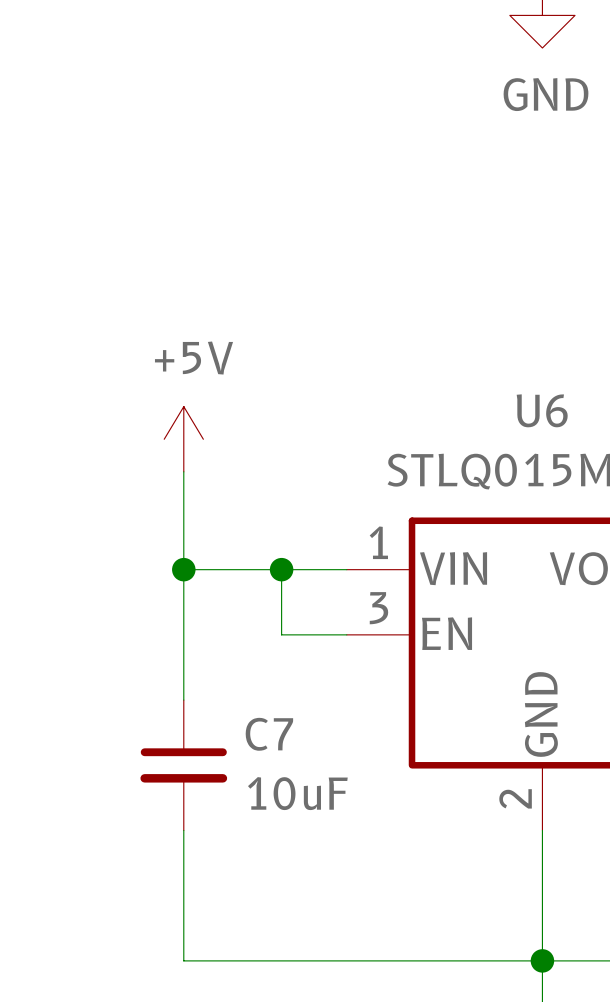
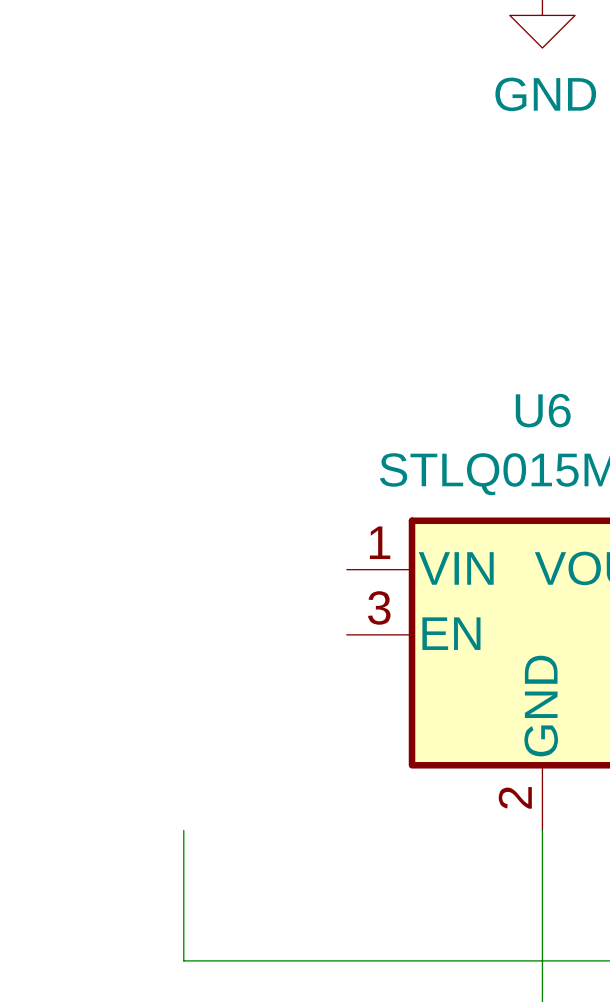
power symbol: +5V (183, 439) -> none
wire: (183, 471) (183, 700) -> none
wire: (183, 569) (346, 569) -> none
junction: (183, 569) -> none
wire: (281, 569) (281, 634) (346, 634) -> none
junction: (281, 569) -> none
C7: 10uF (183, 765) -> none
junction: (542, 960) -> none

